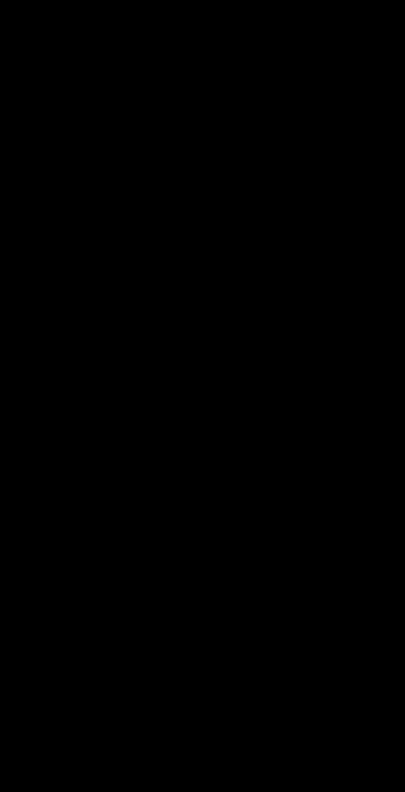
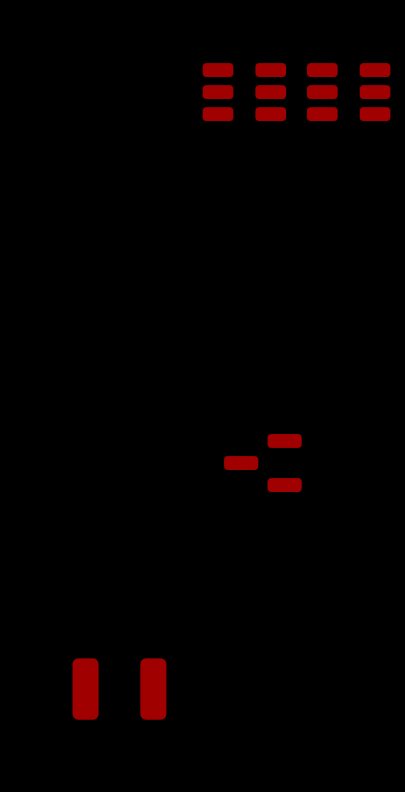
part: none -> (244, 92)
part: none -> (348, 92)
part: none -> (262, 463)
part: none -> (119, 689)

